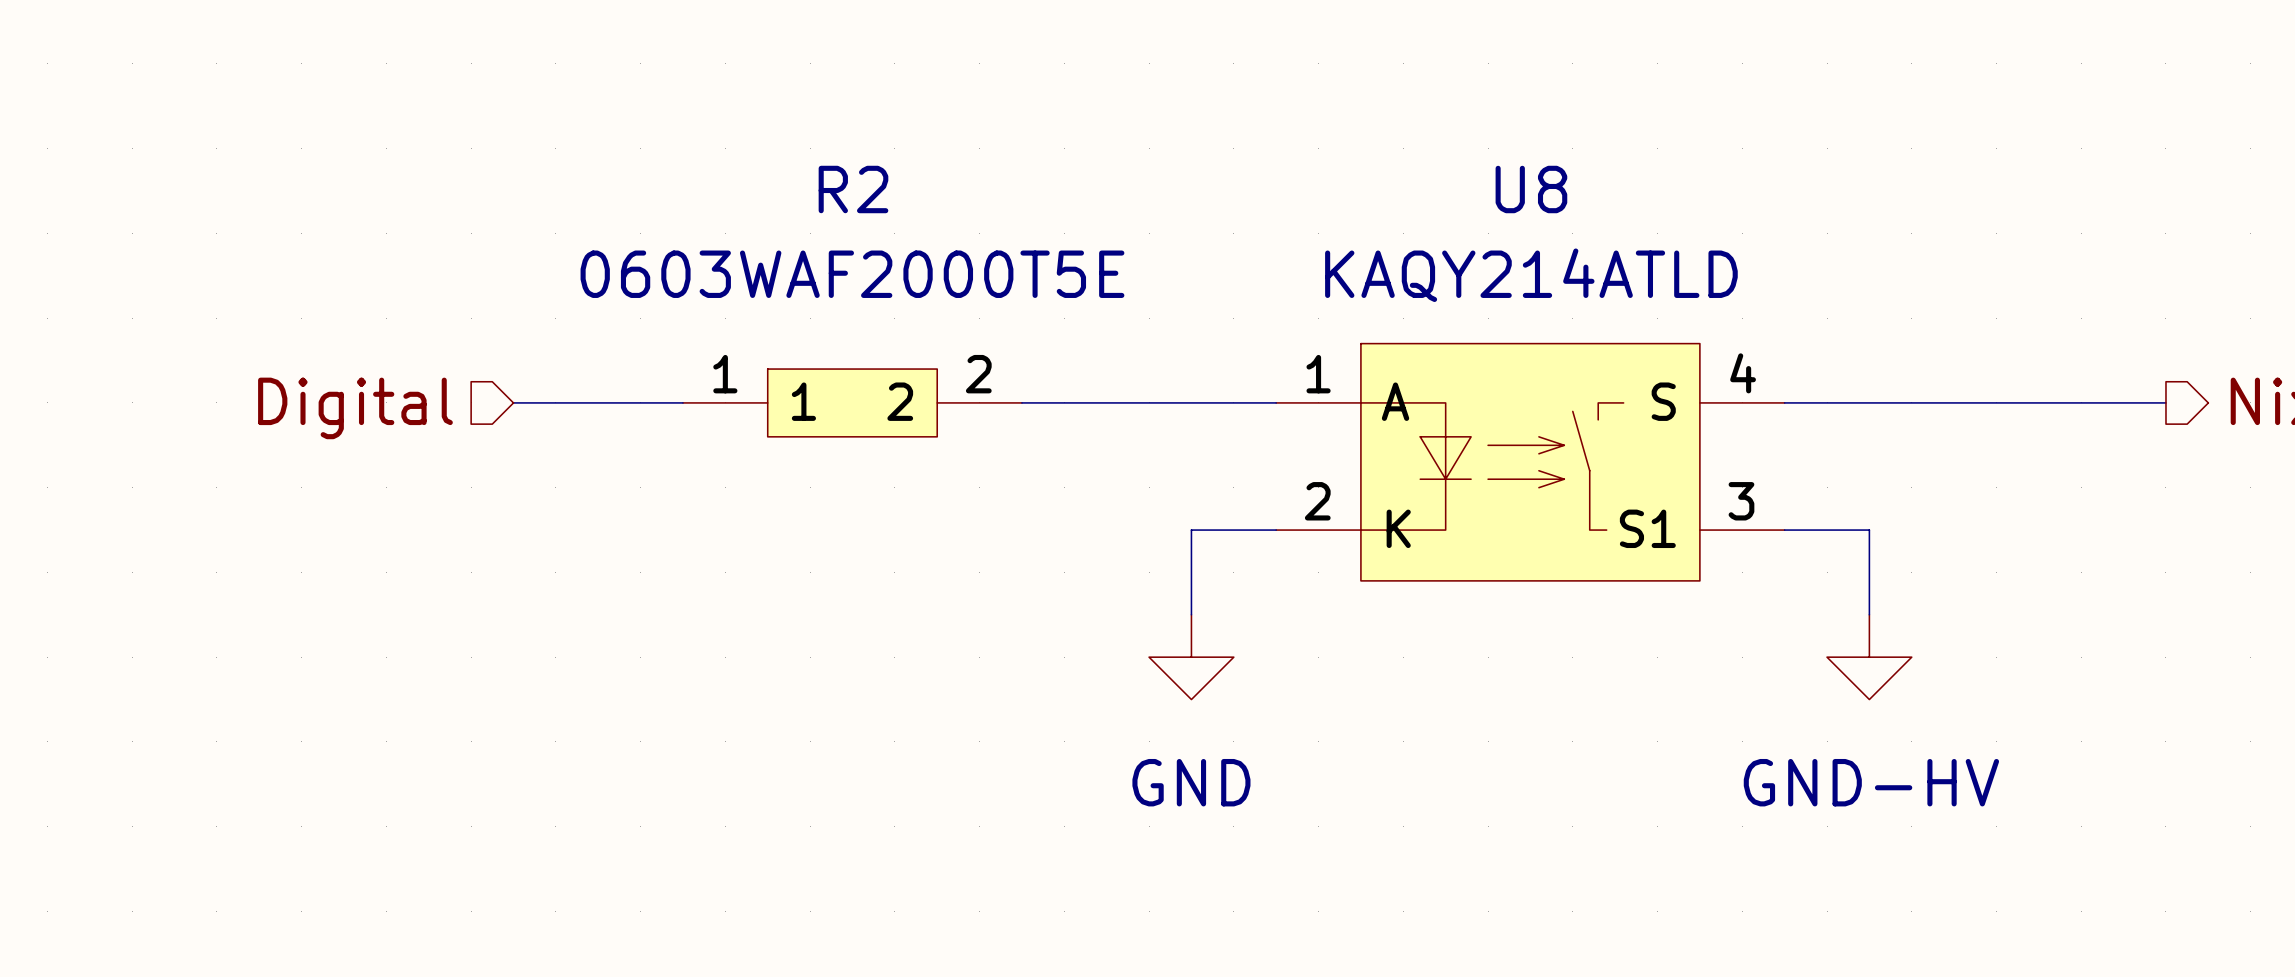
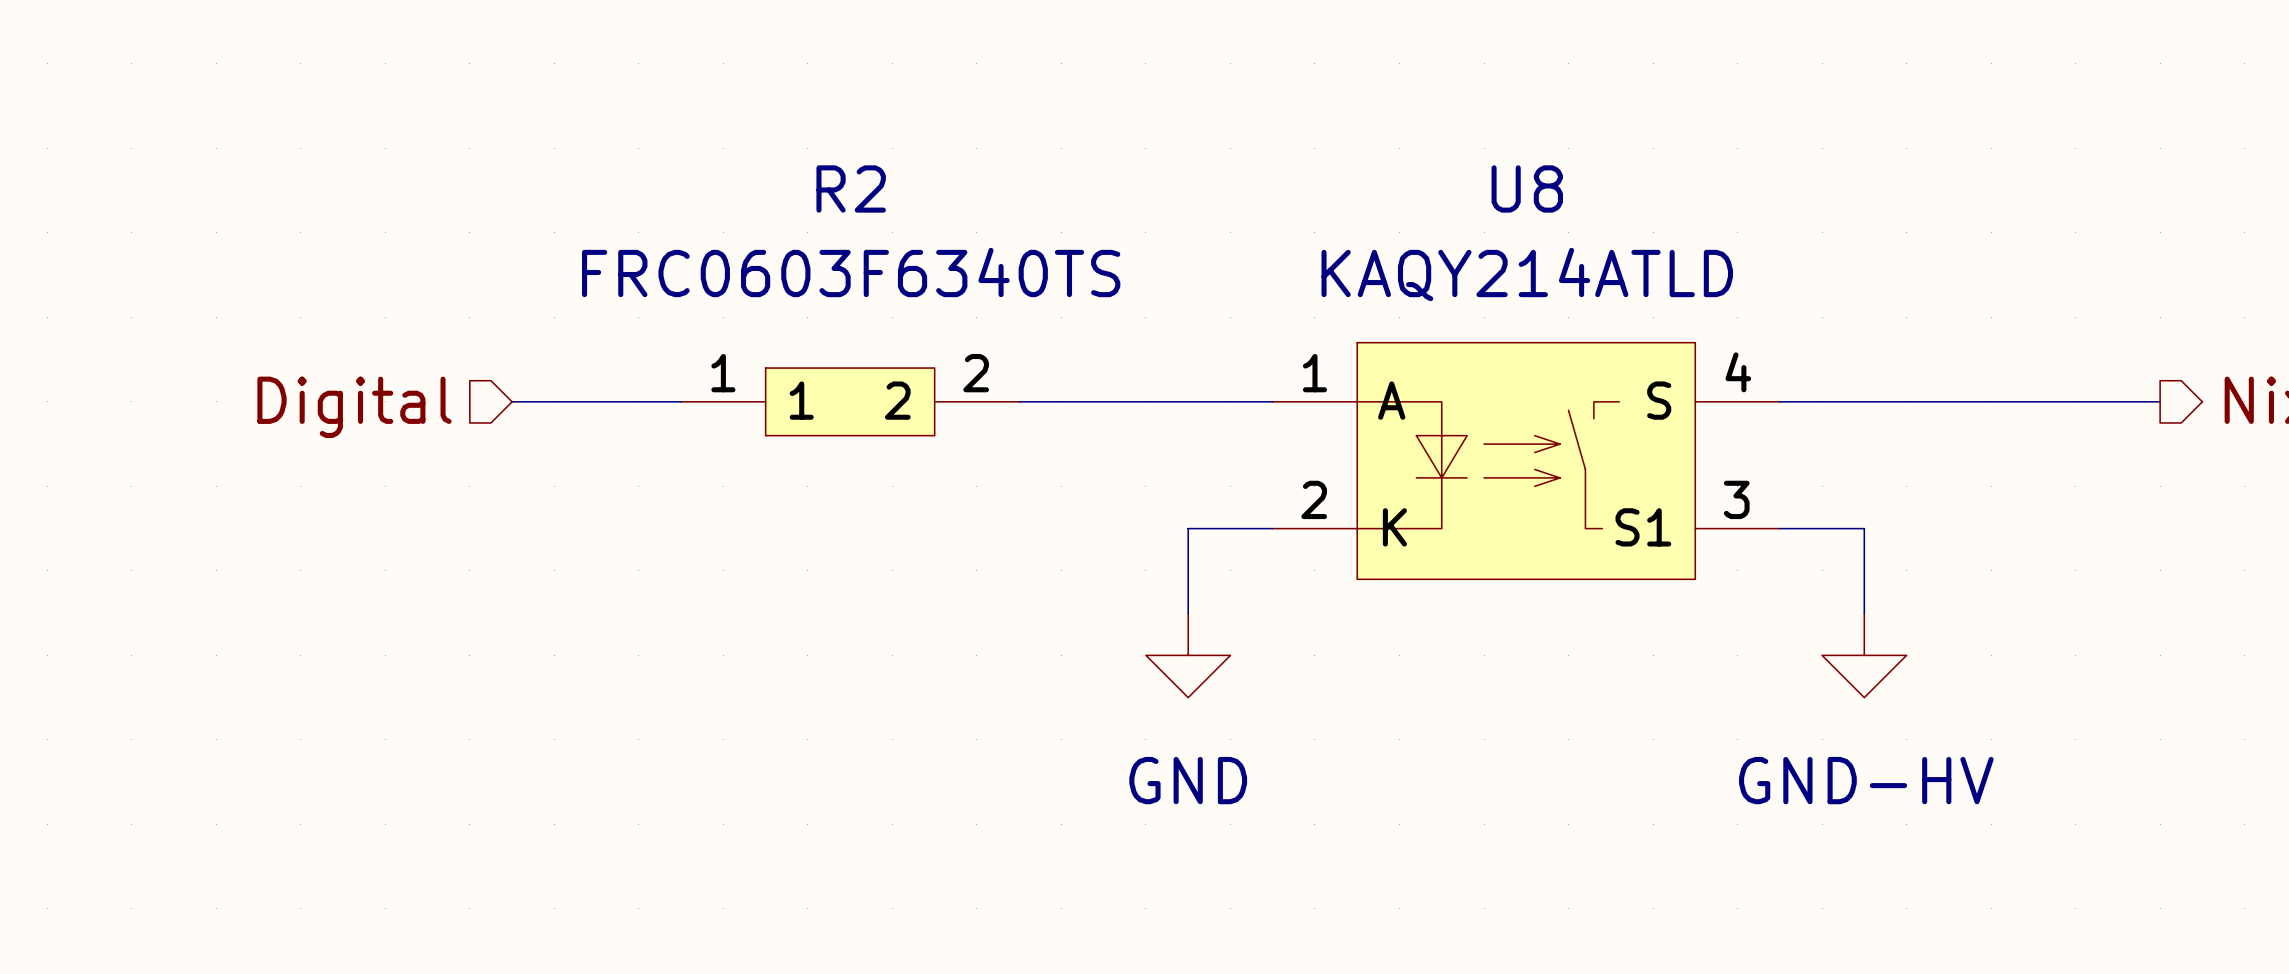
R2 value: 0603WAF2000T5E (852, 274) -> FRC0603F6340TS (851, 272)

